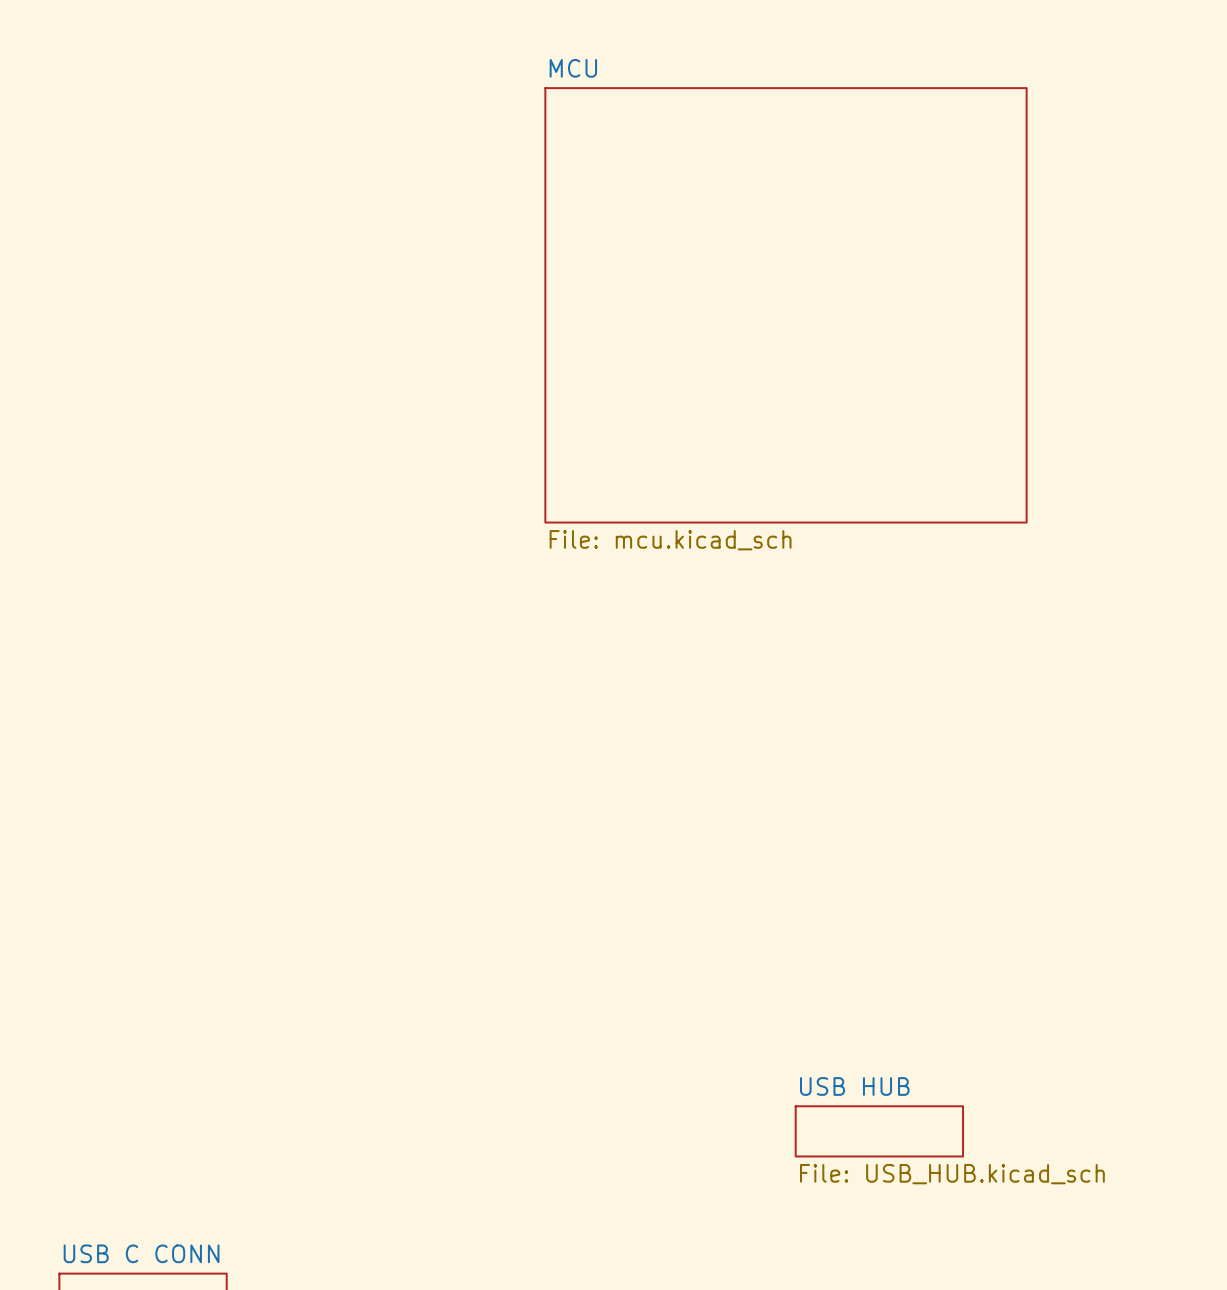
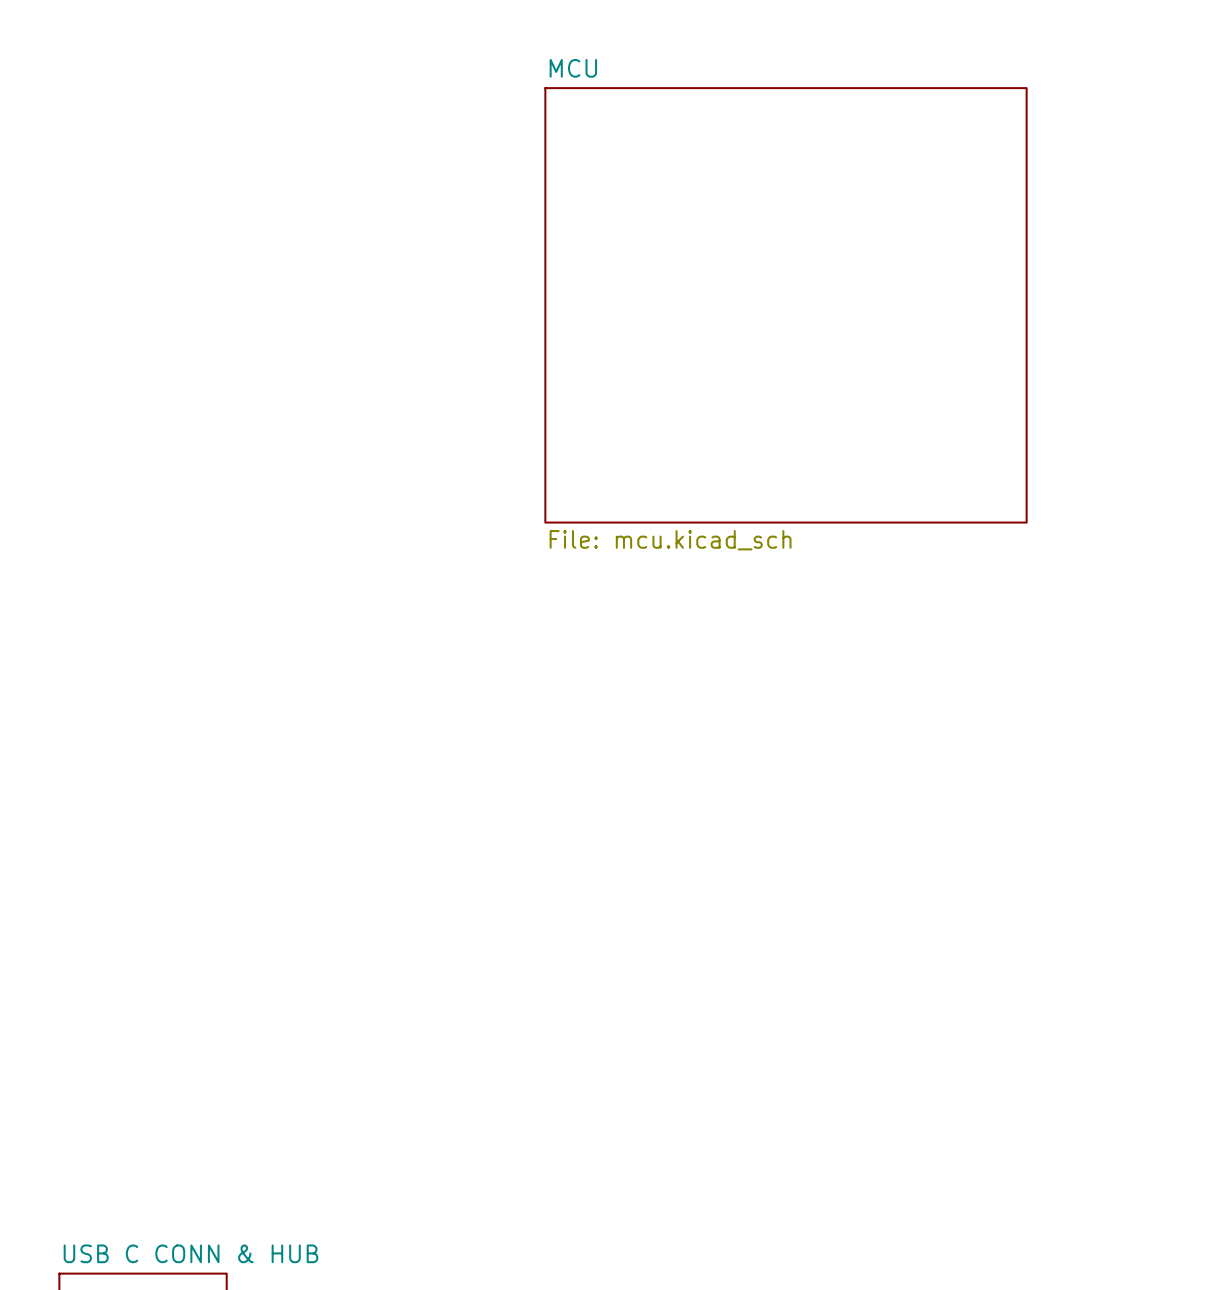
sheet USB HUB: File: USB_HUB.kicad_sch (879, 1131) -> none
sheet USB C CONN name: USB C CONN (141, 1253) -> USB C CONN & HUB (190, 1253)

